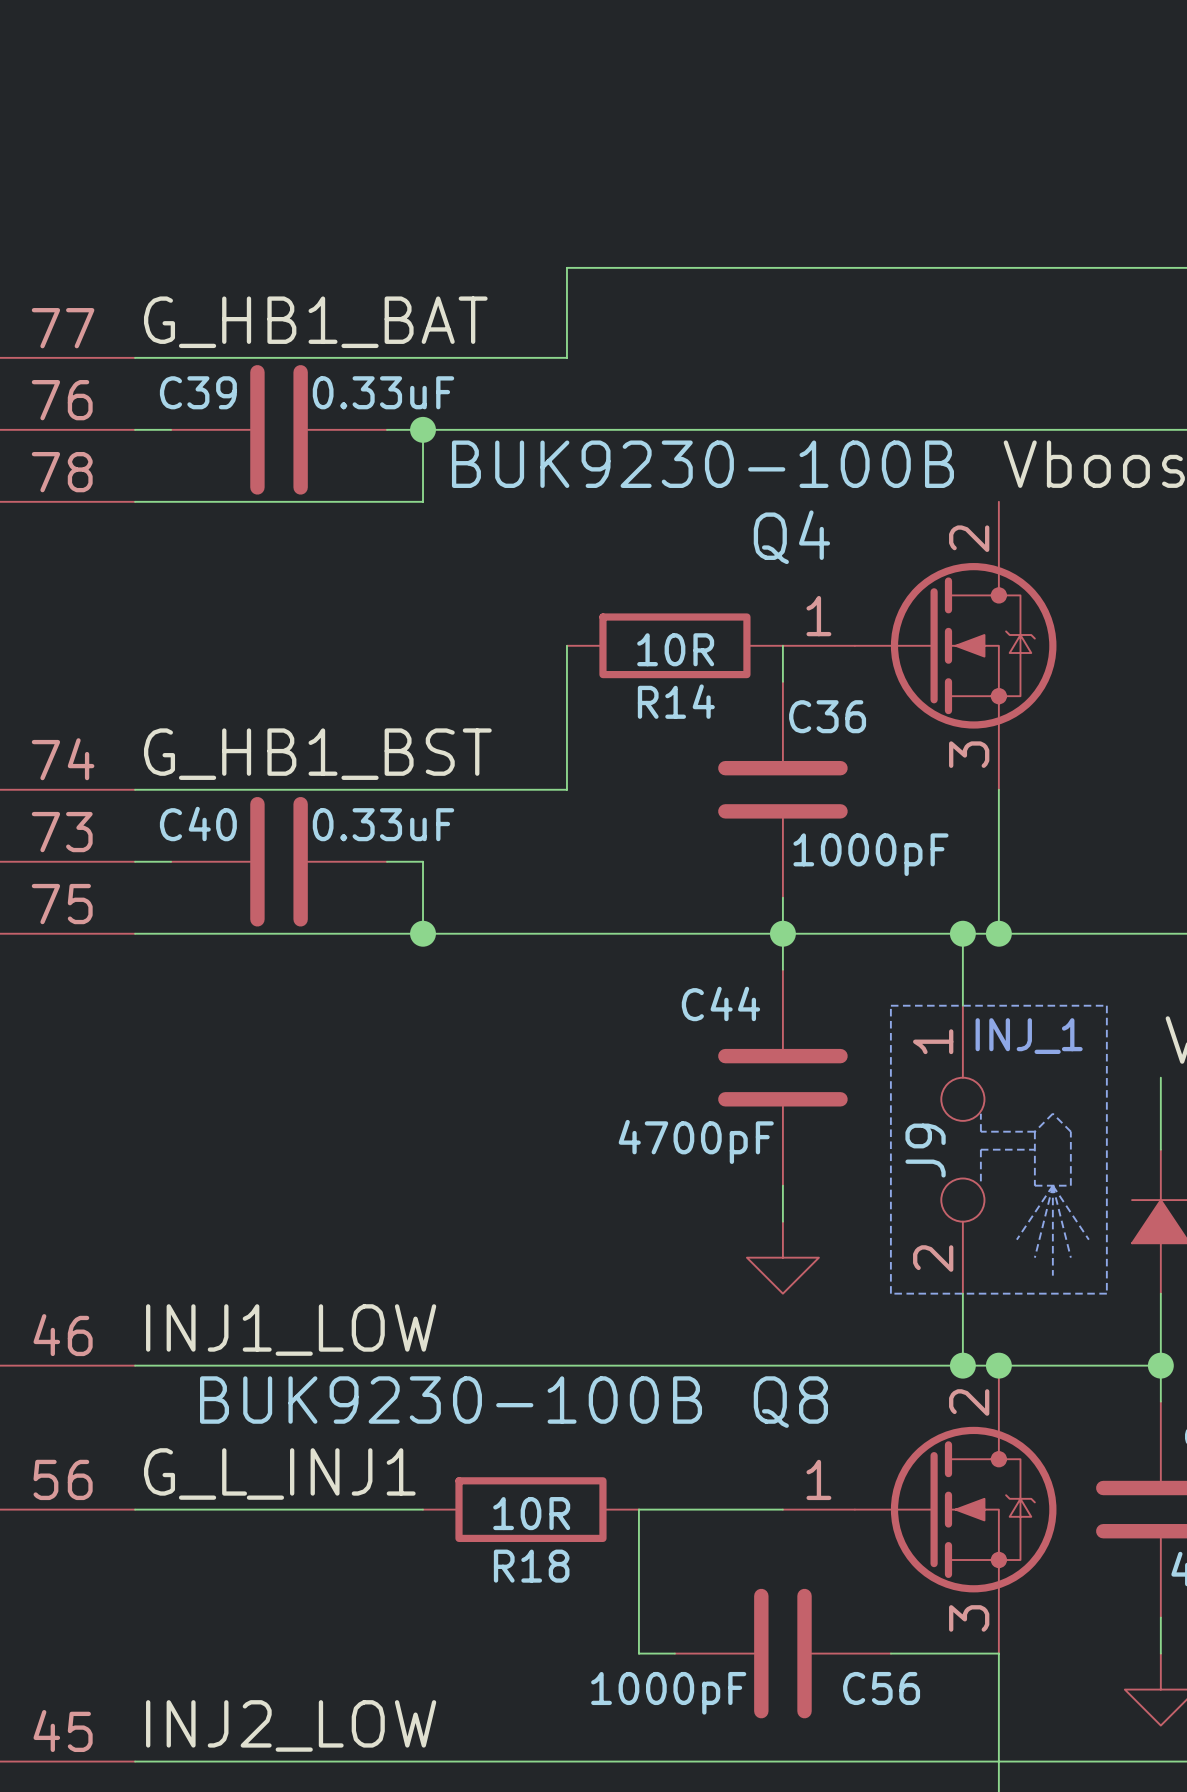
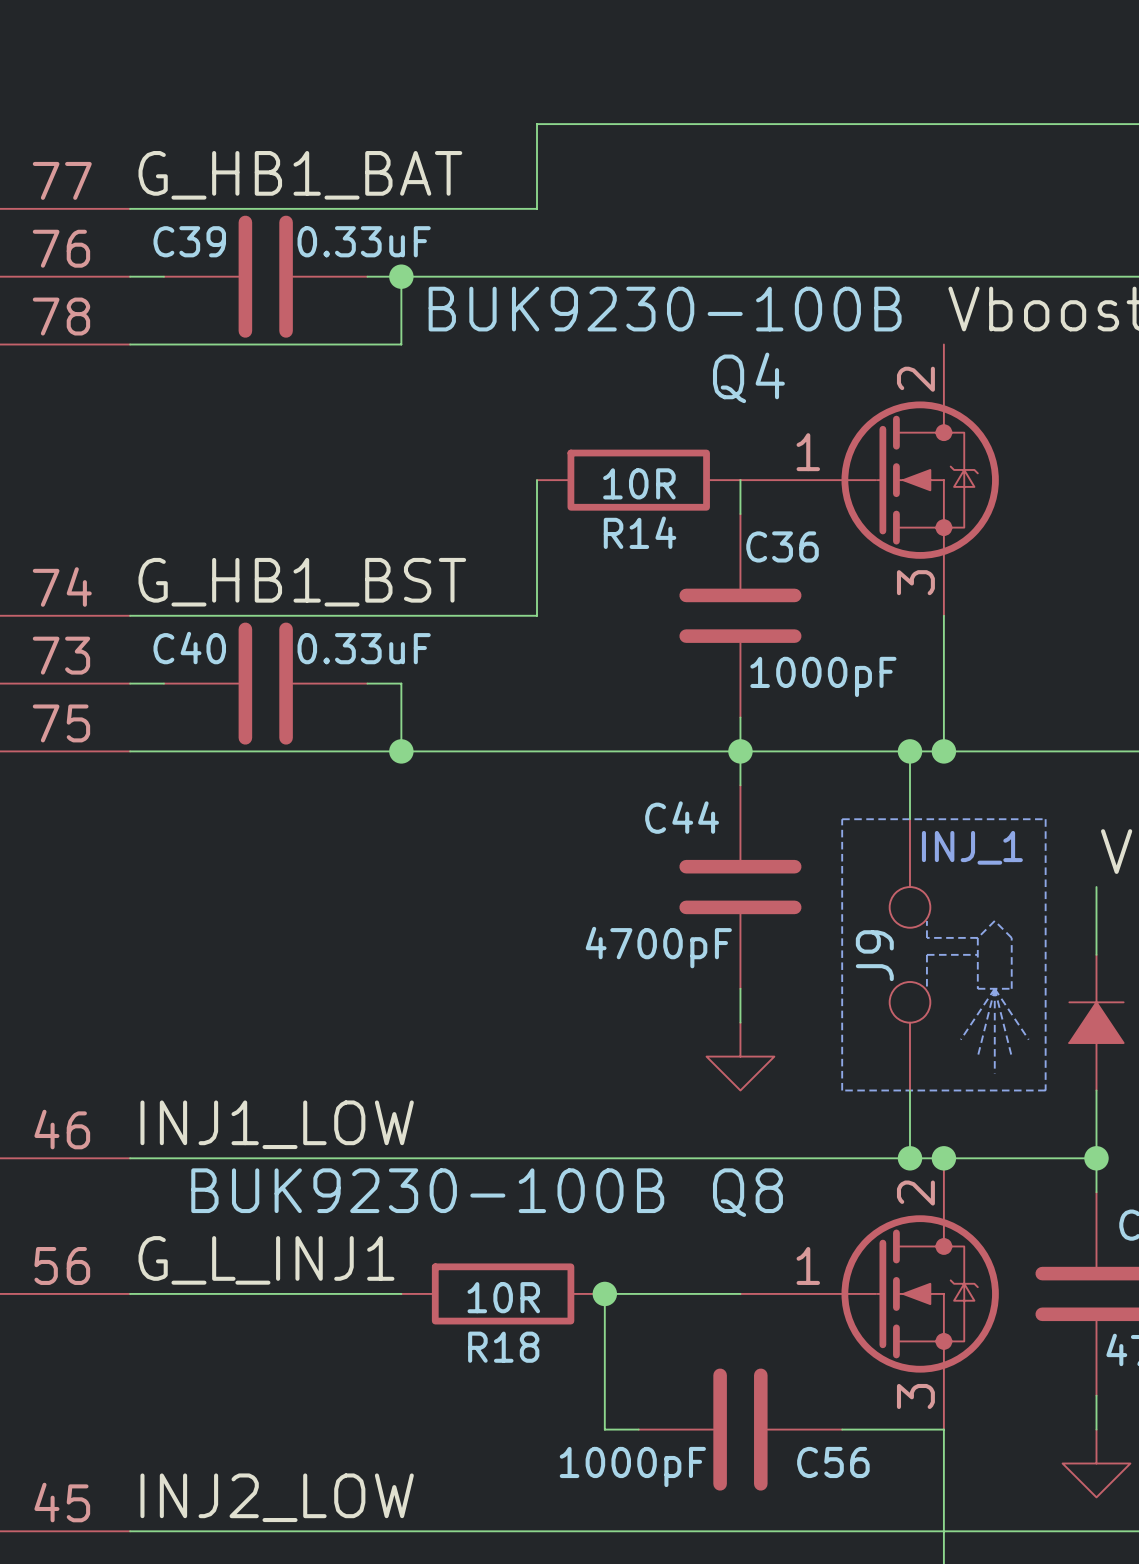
Q4 symbol: [782, 501, 1057, 790] -> [740, 344, 999, 616]
J9 pin number: 1 (933, 1041) -> none
J9 pin number: 2 (933, 1258) -> none
Q8 symbol: [782, 1365, 1057, 1654] -> [740, 1158, 999, 1430]
junction: none -> (604, 1293)

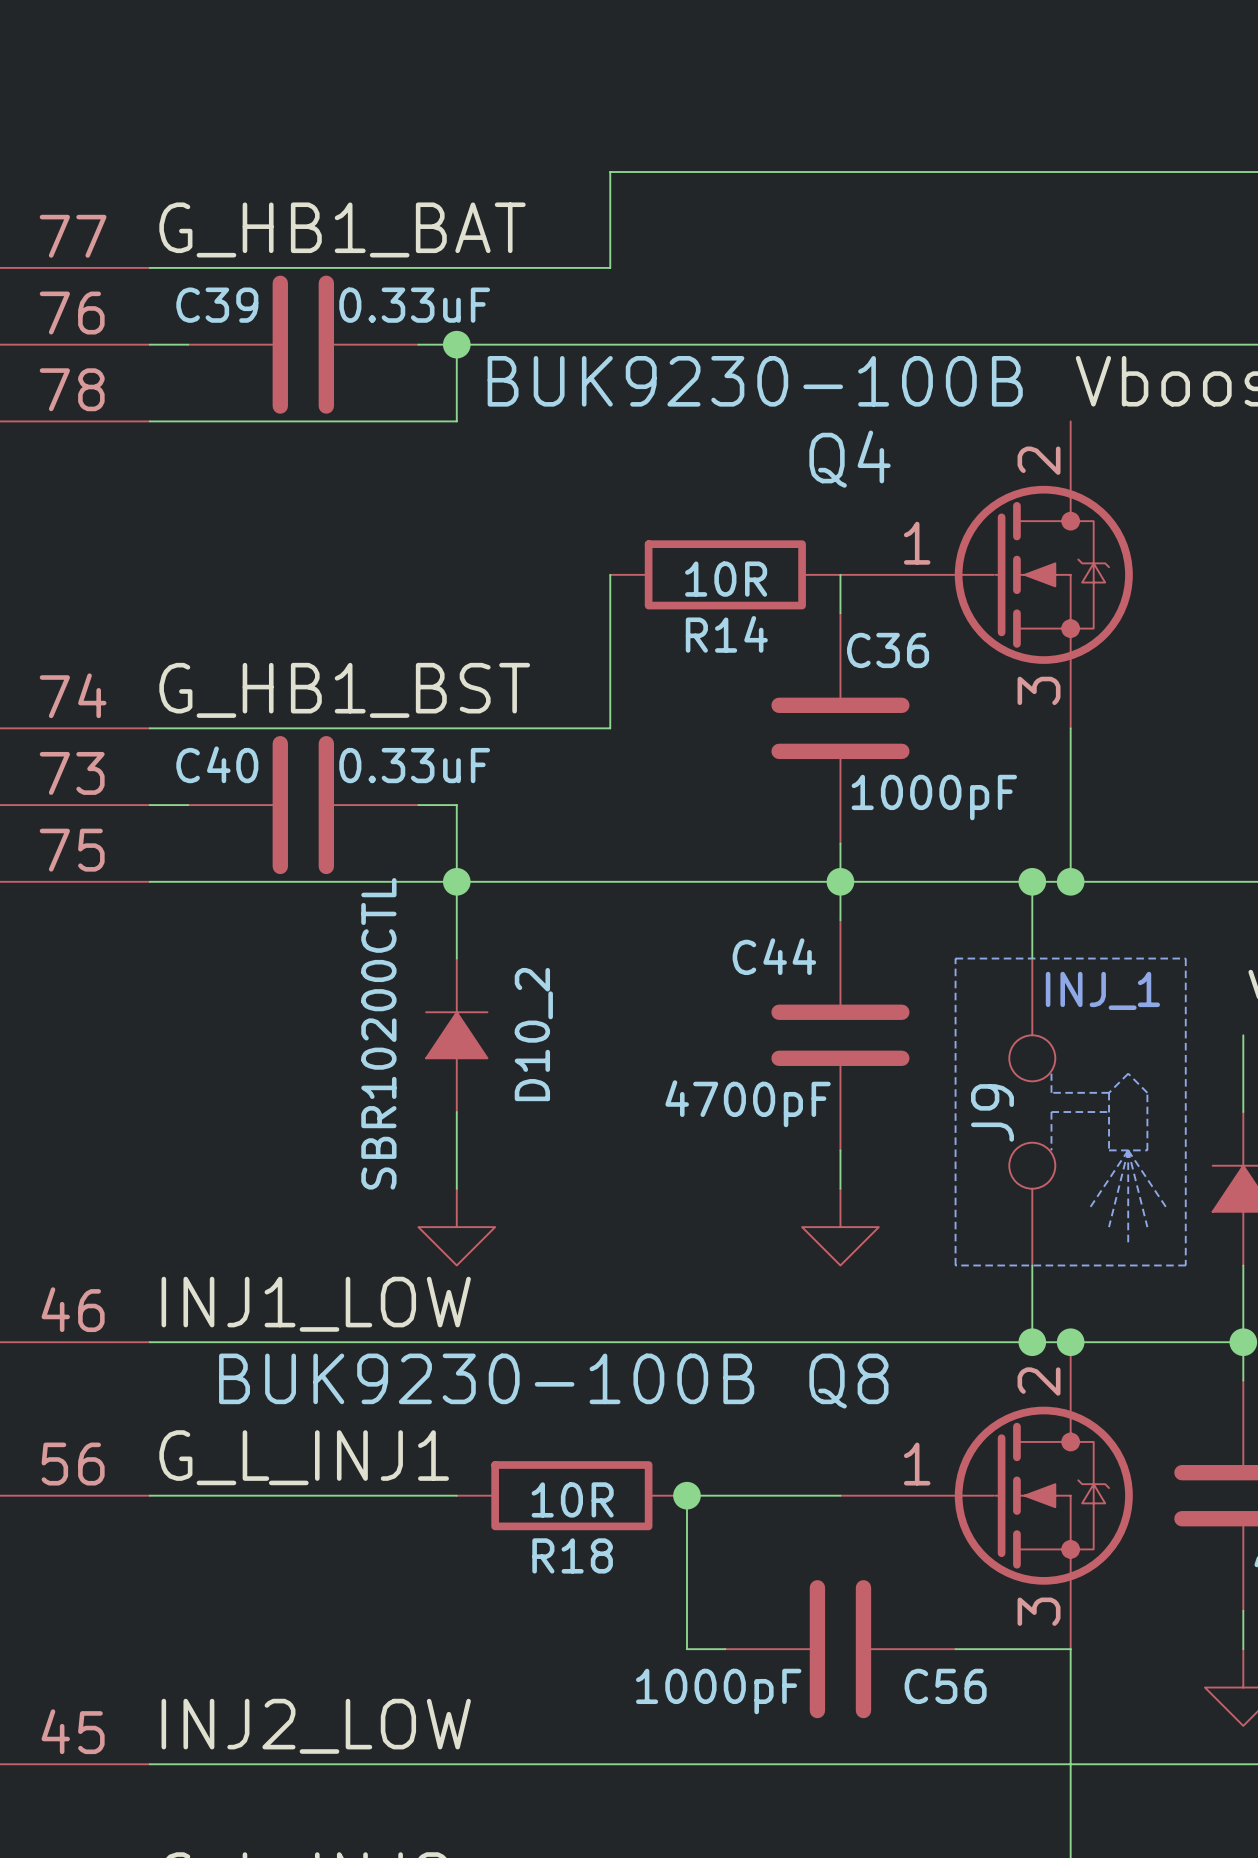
wire: none -> (456, 881) (456, 958)
D10_2: none -> SBR10200CTL (456, 1035)
wire: none -> (456, 1112) (456, 1188)
power symbol: none -> (456, 1227)

